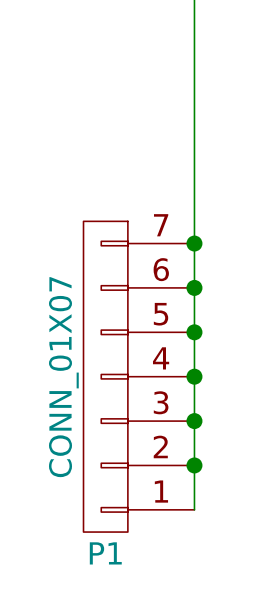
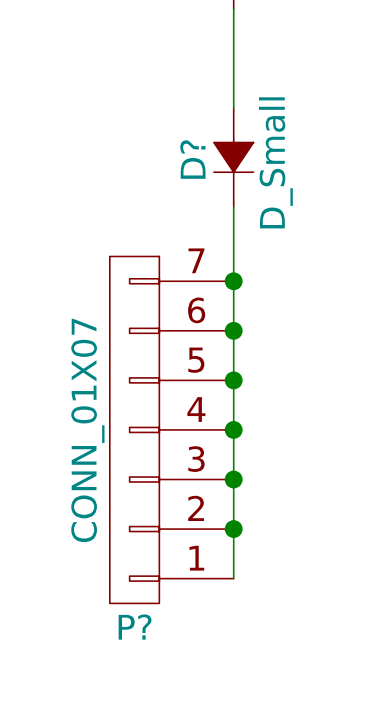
D?: none -> D_Small (233, 157)
P1 name: P1 (105, 553) -> P? (135, 627)

